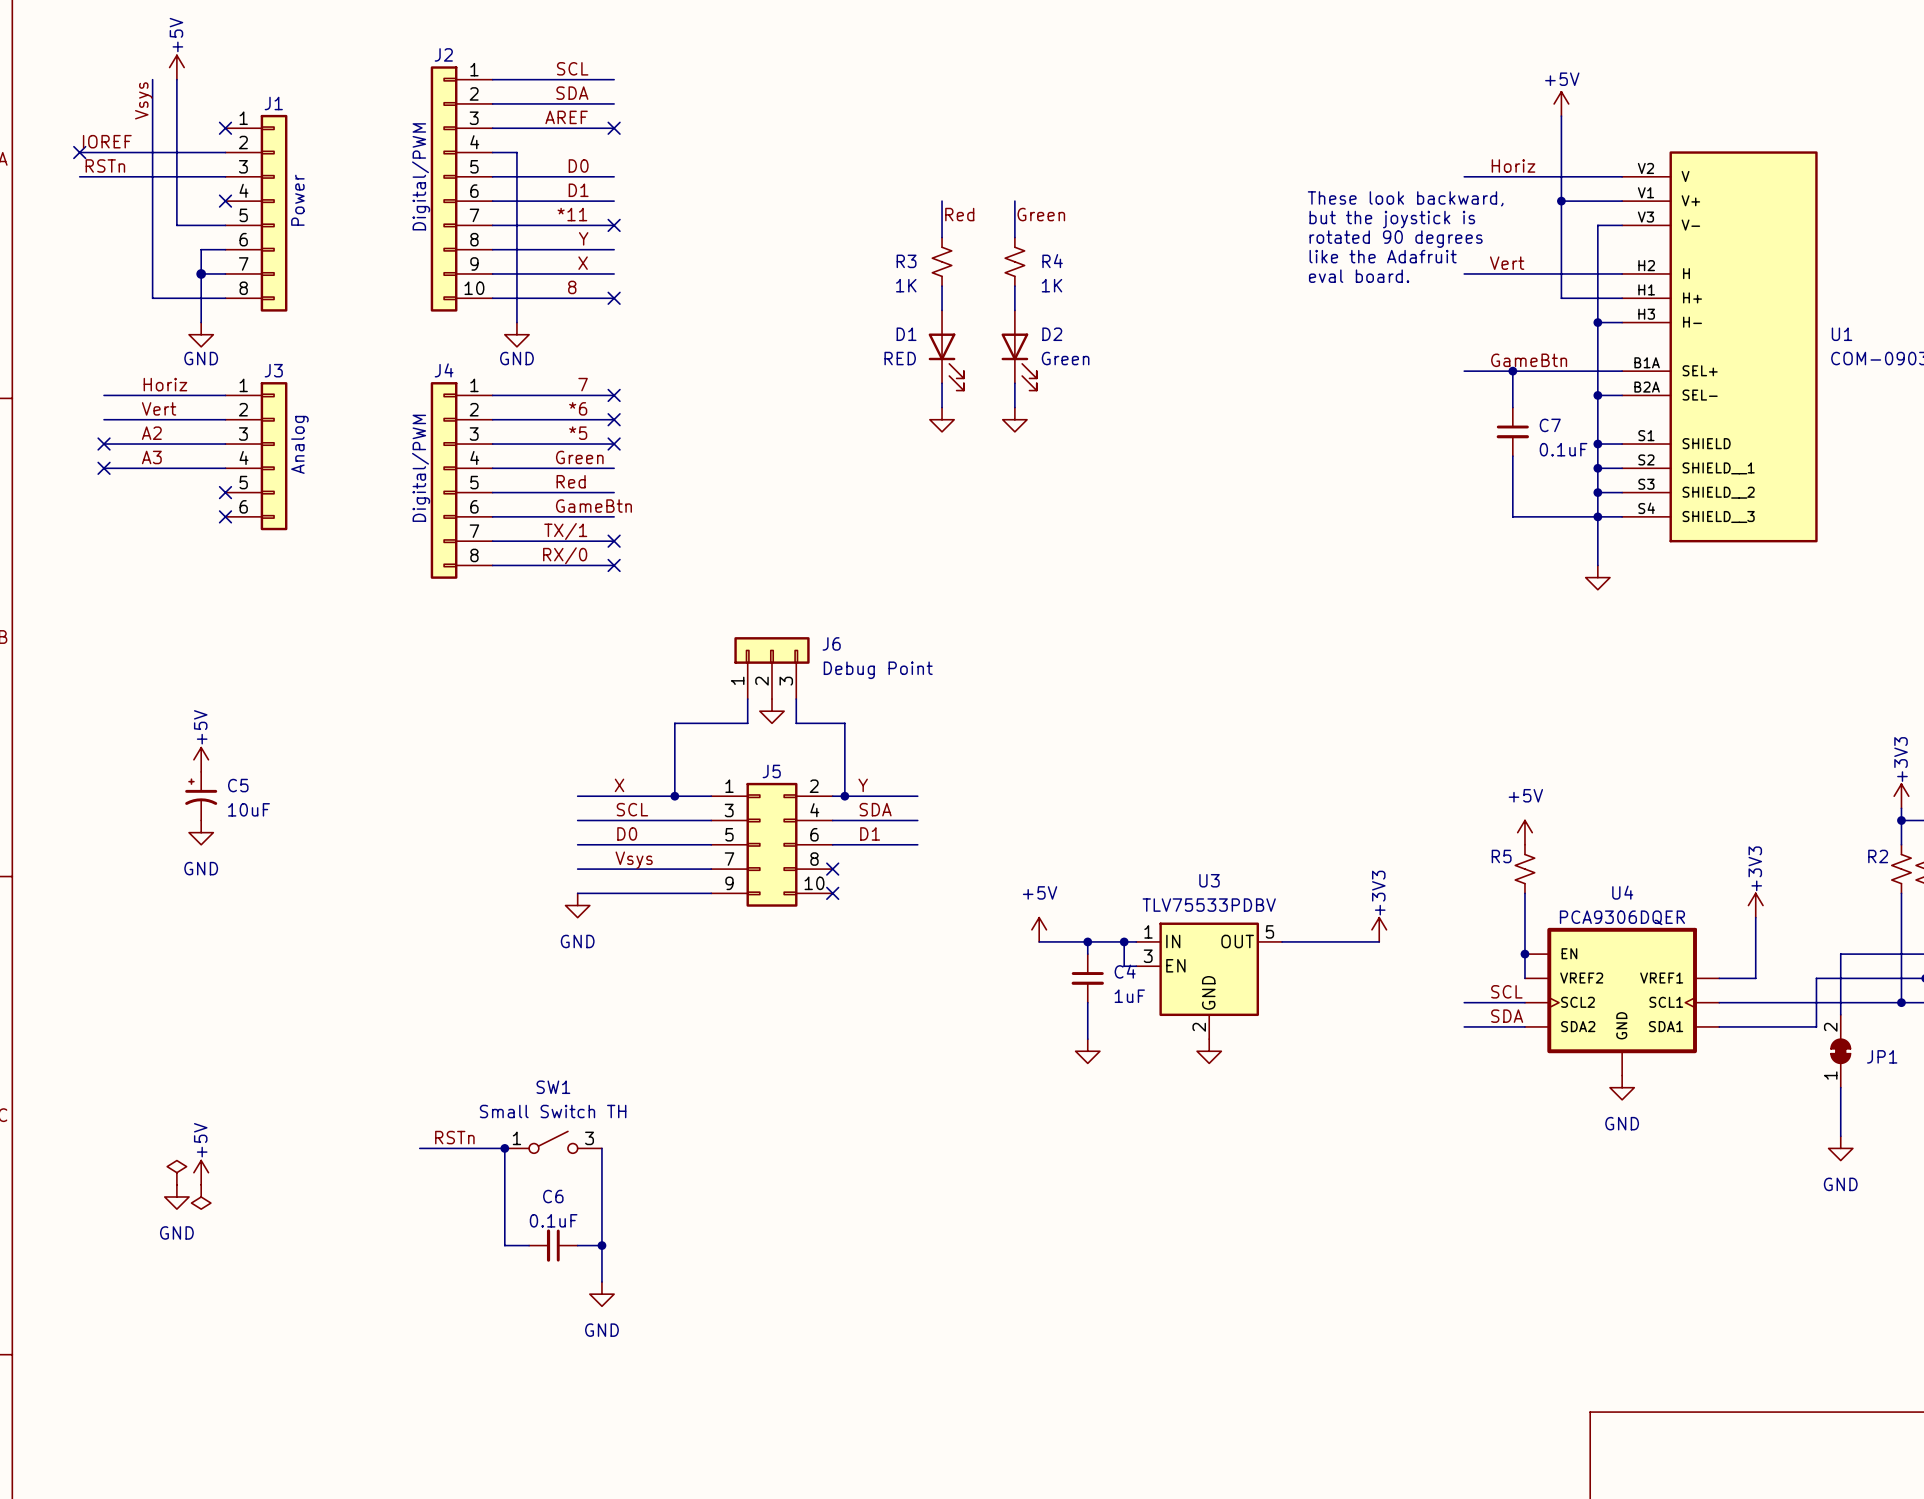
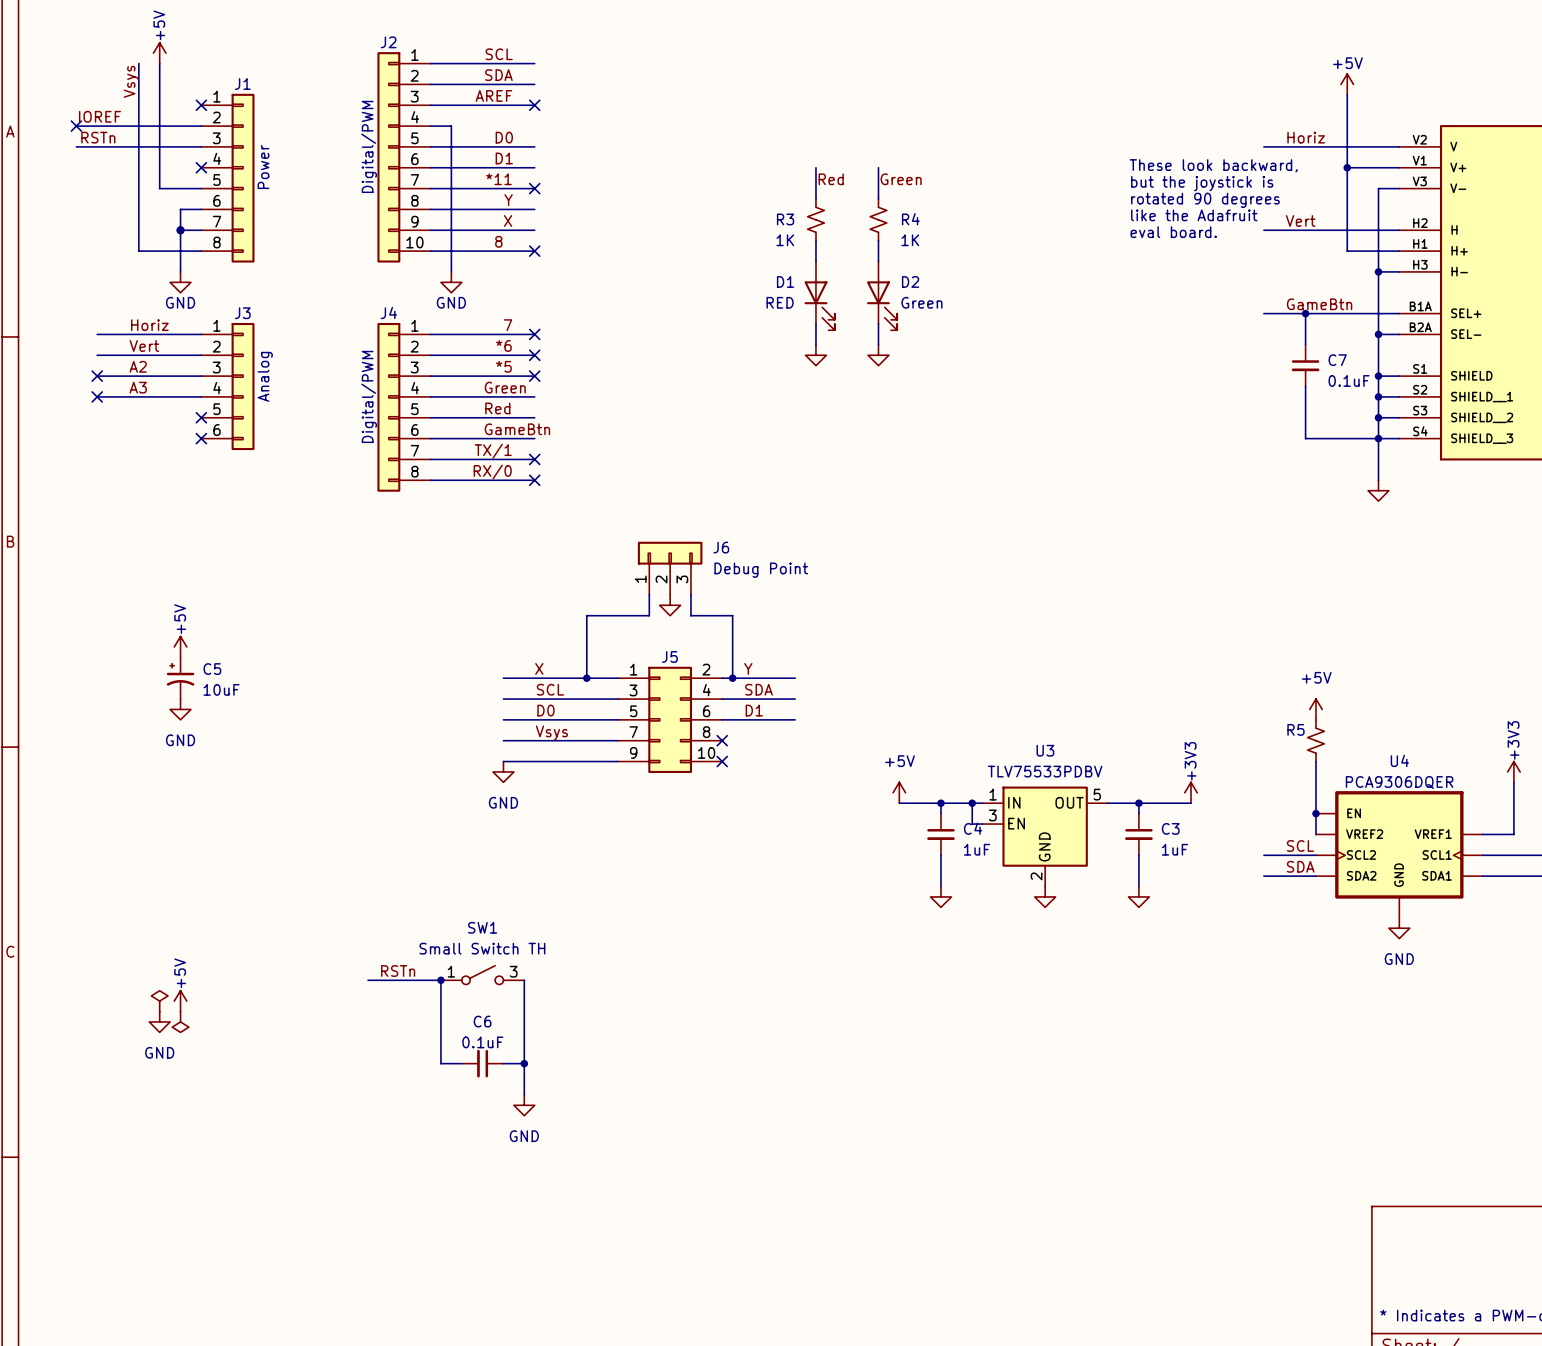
wire: none -> (1138, 803) (1138, 813)
junction: none -> (1138, 803)
C3: none -> 1uF (1138, 834)
wire: none -> (1138, 855) (1138, 886)
power symbol: none -> (1138, 896)

